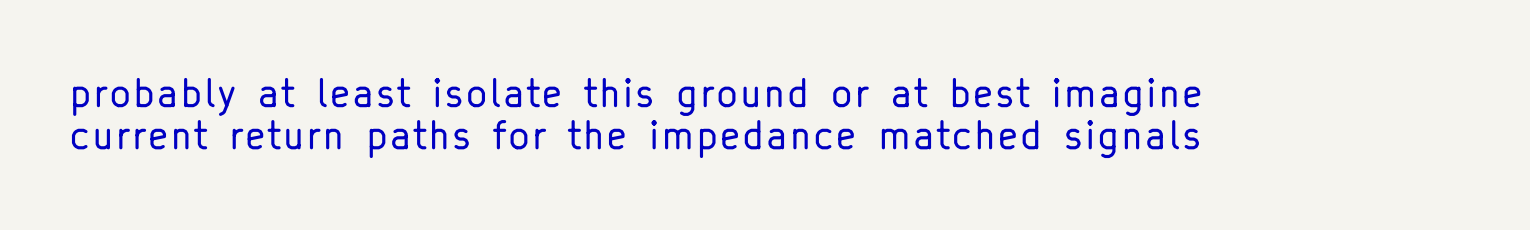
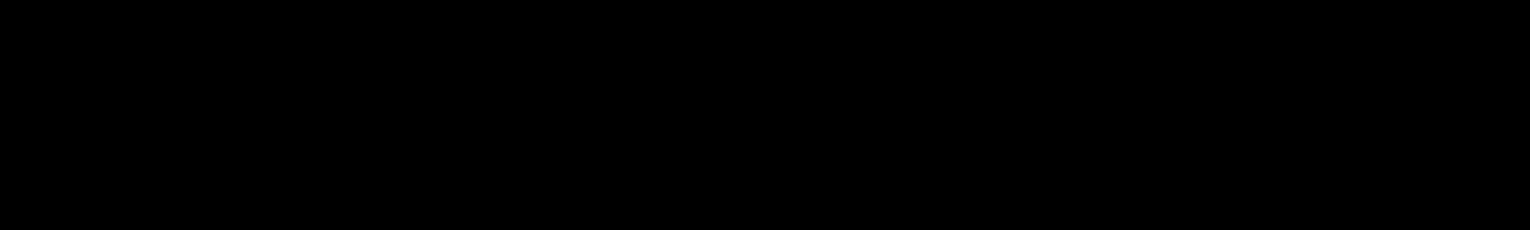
text: probably at least isolate this ground or at best imagine (636, 96) -> none
text: current return paths for the impedance matched signals (635, 139) -> none

